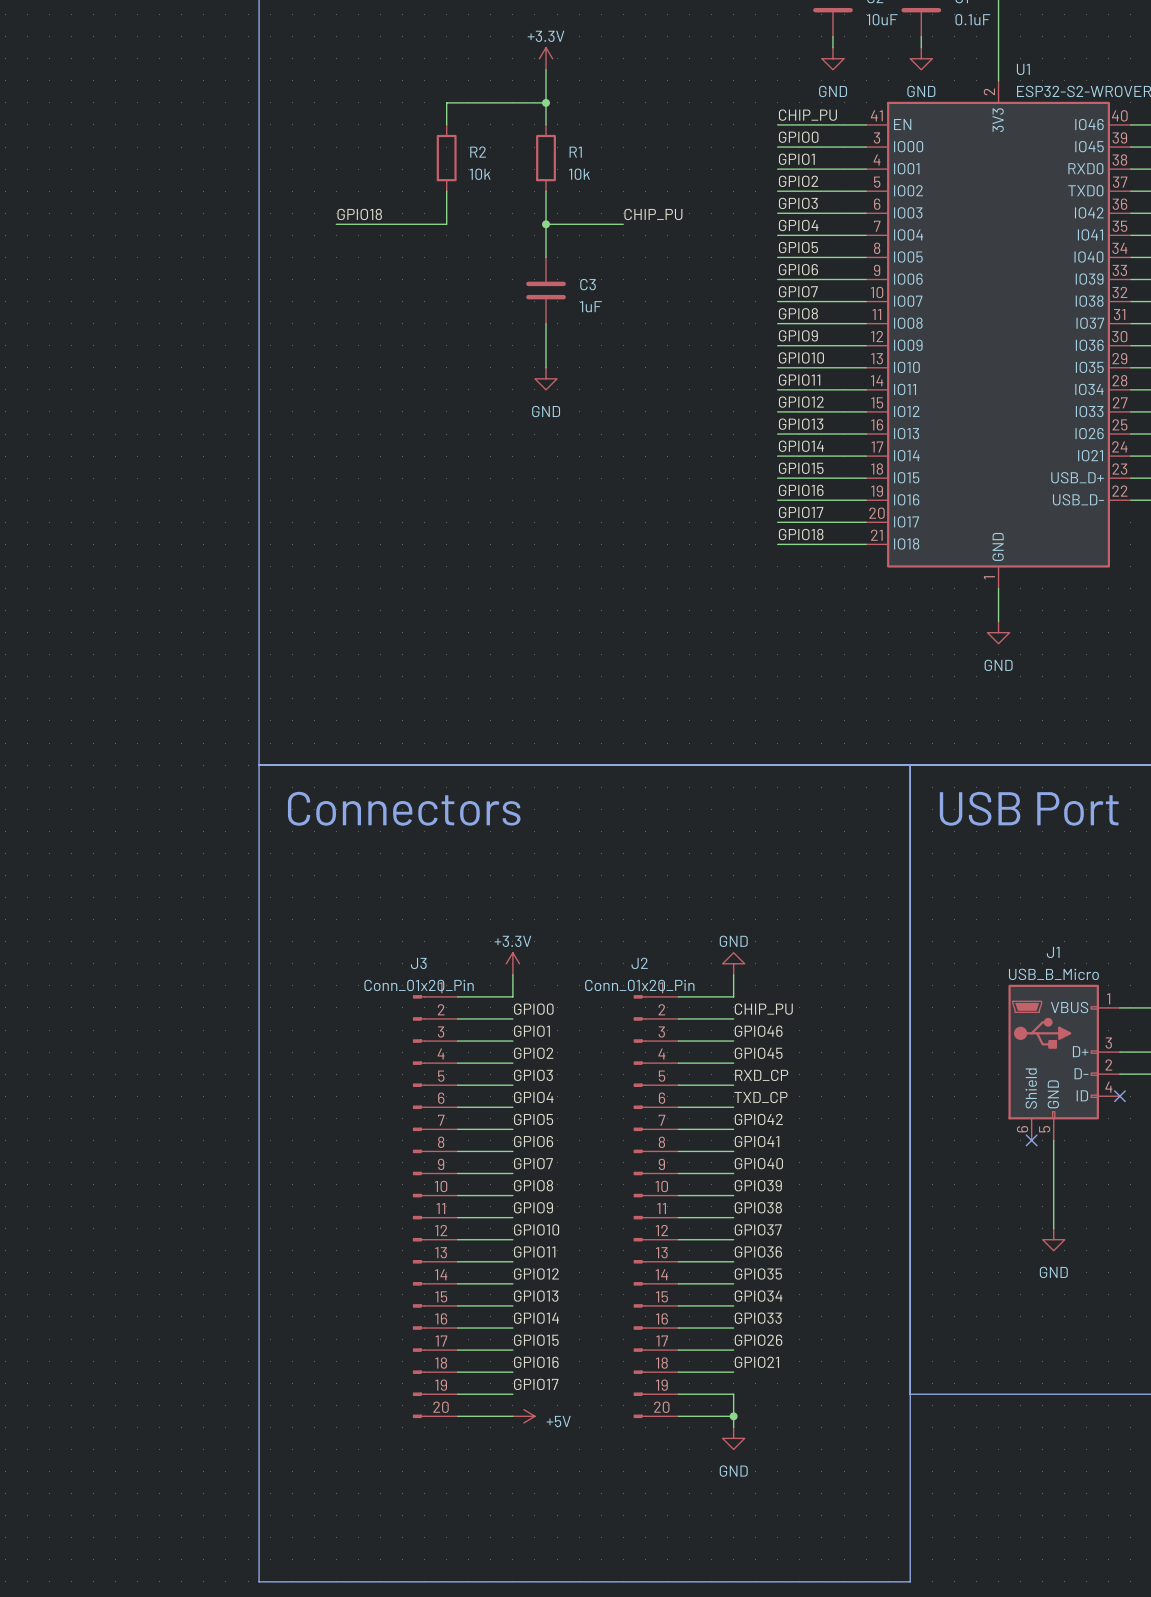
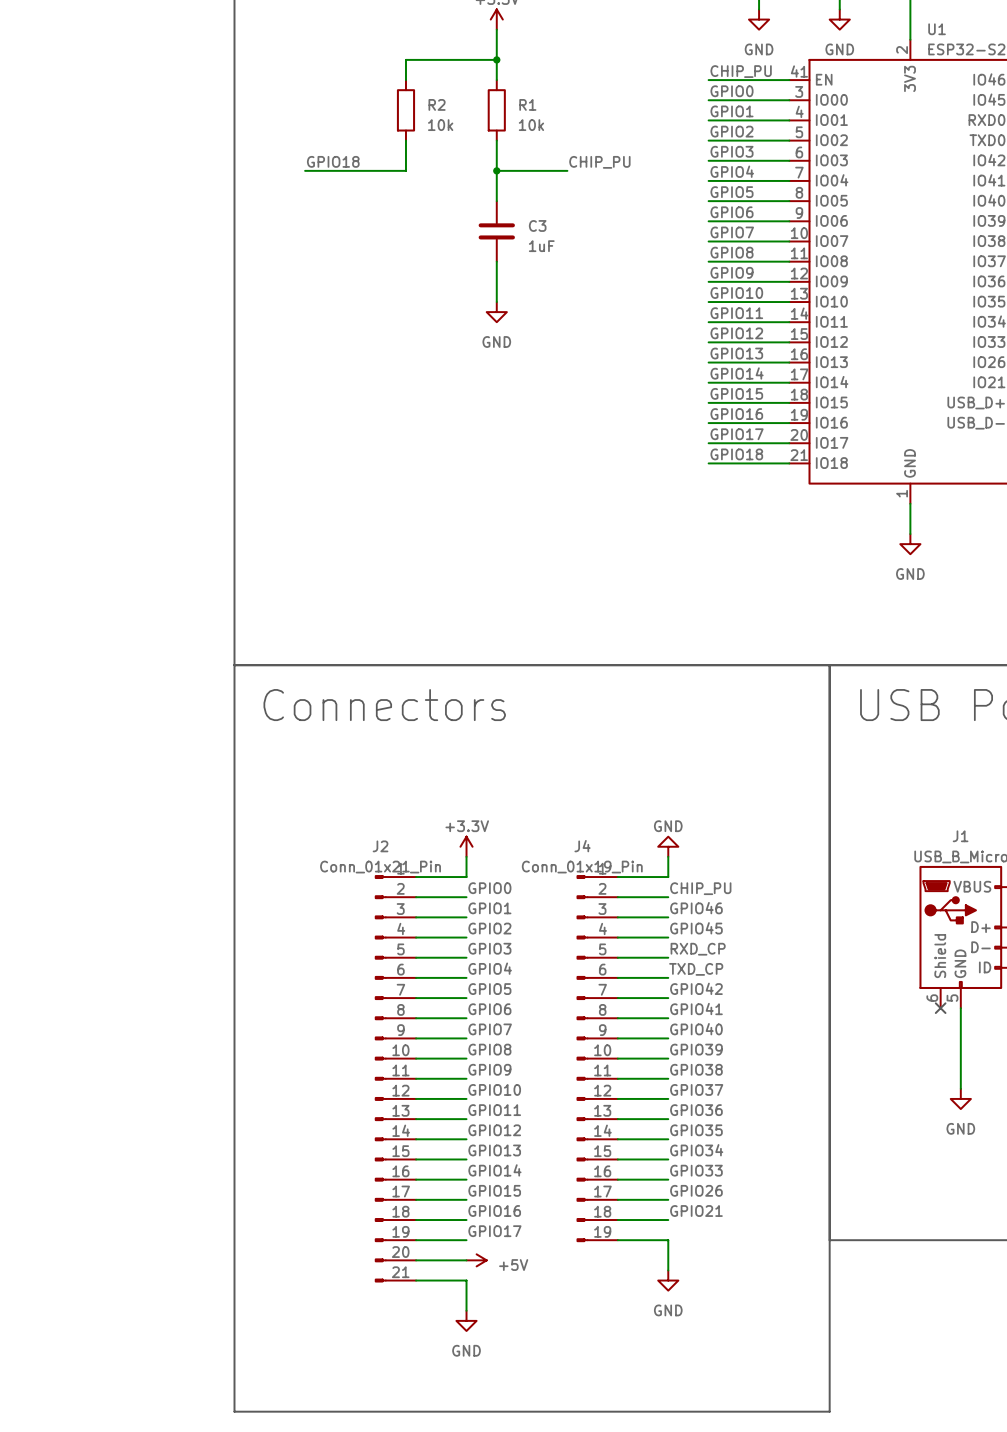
J2 value: Conn_01x20_Pin (639, 985) -> Conn_01x21_Pin (380, 867)
J2 symbol: [633, 995, 679, 1419] -> [375, 875, 417, 1283]
J4: none -> Conn_01x19_Pin (597, 1058)
J3: Conn_01x20_Pin (435, 1206) -> none
wire: (678, 1416) (733, 1416) -> none
junction: (733, 1416) -> none
wire: none -> (416, 1280) (466, 1280) (466, 1310)
power symbol: none -> GND (466, 1320)

